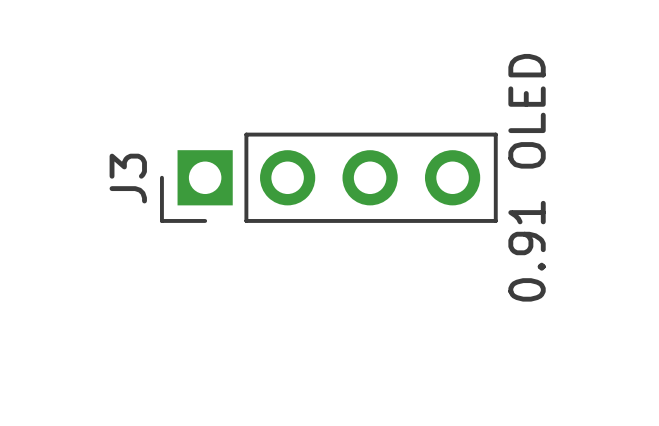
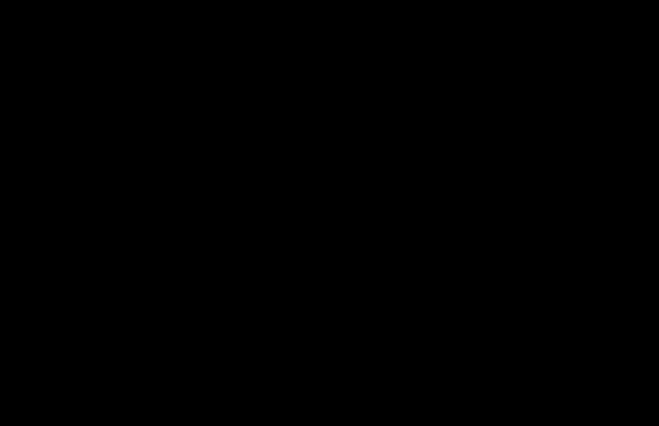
J3: 0.91 OLED (328, 177) -> none

